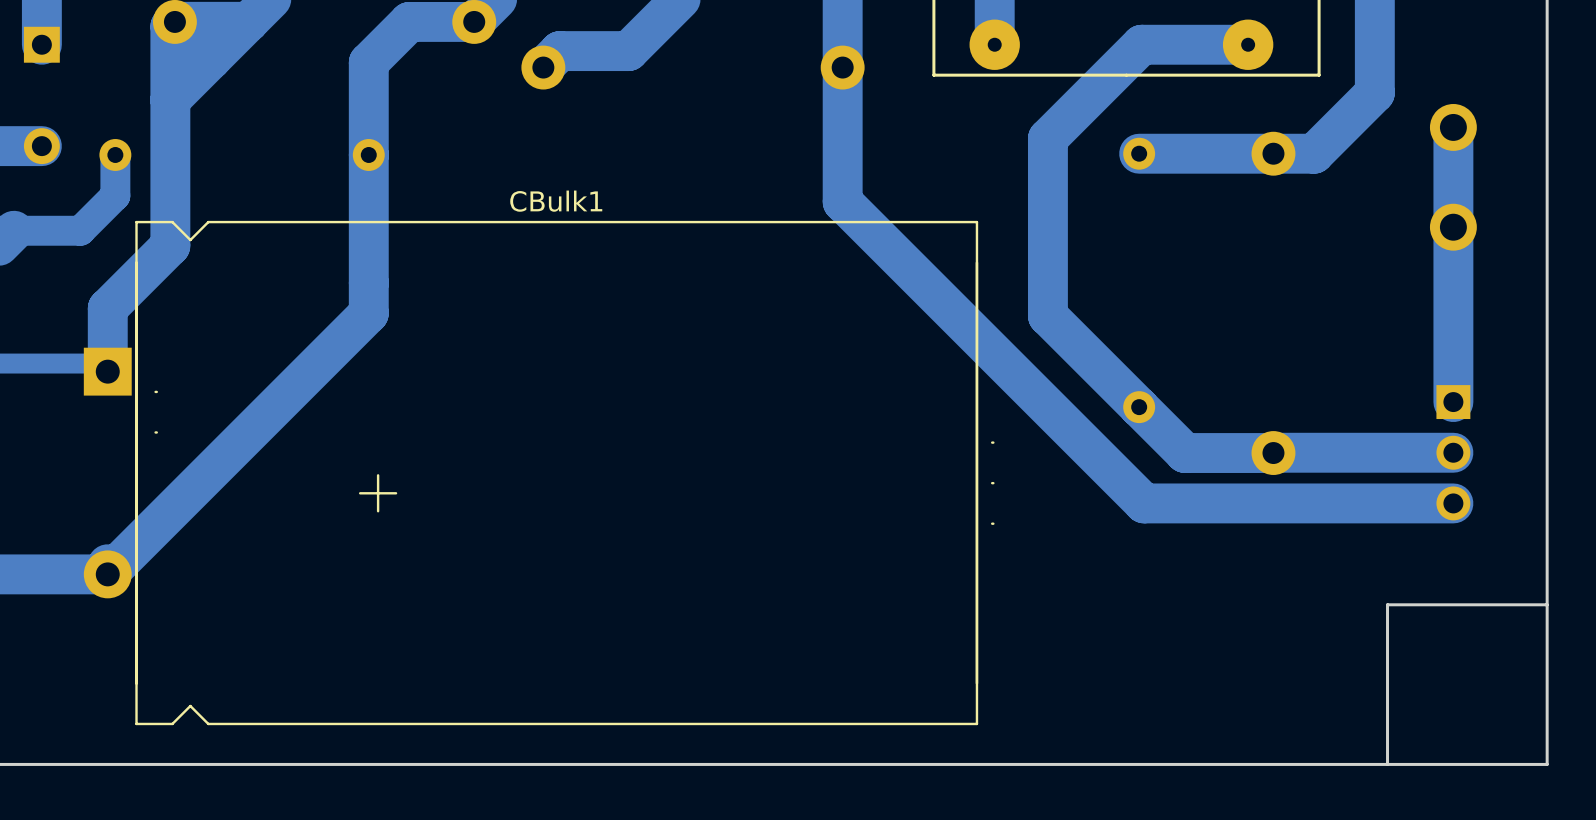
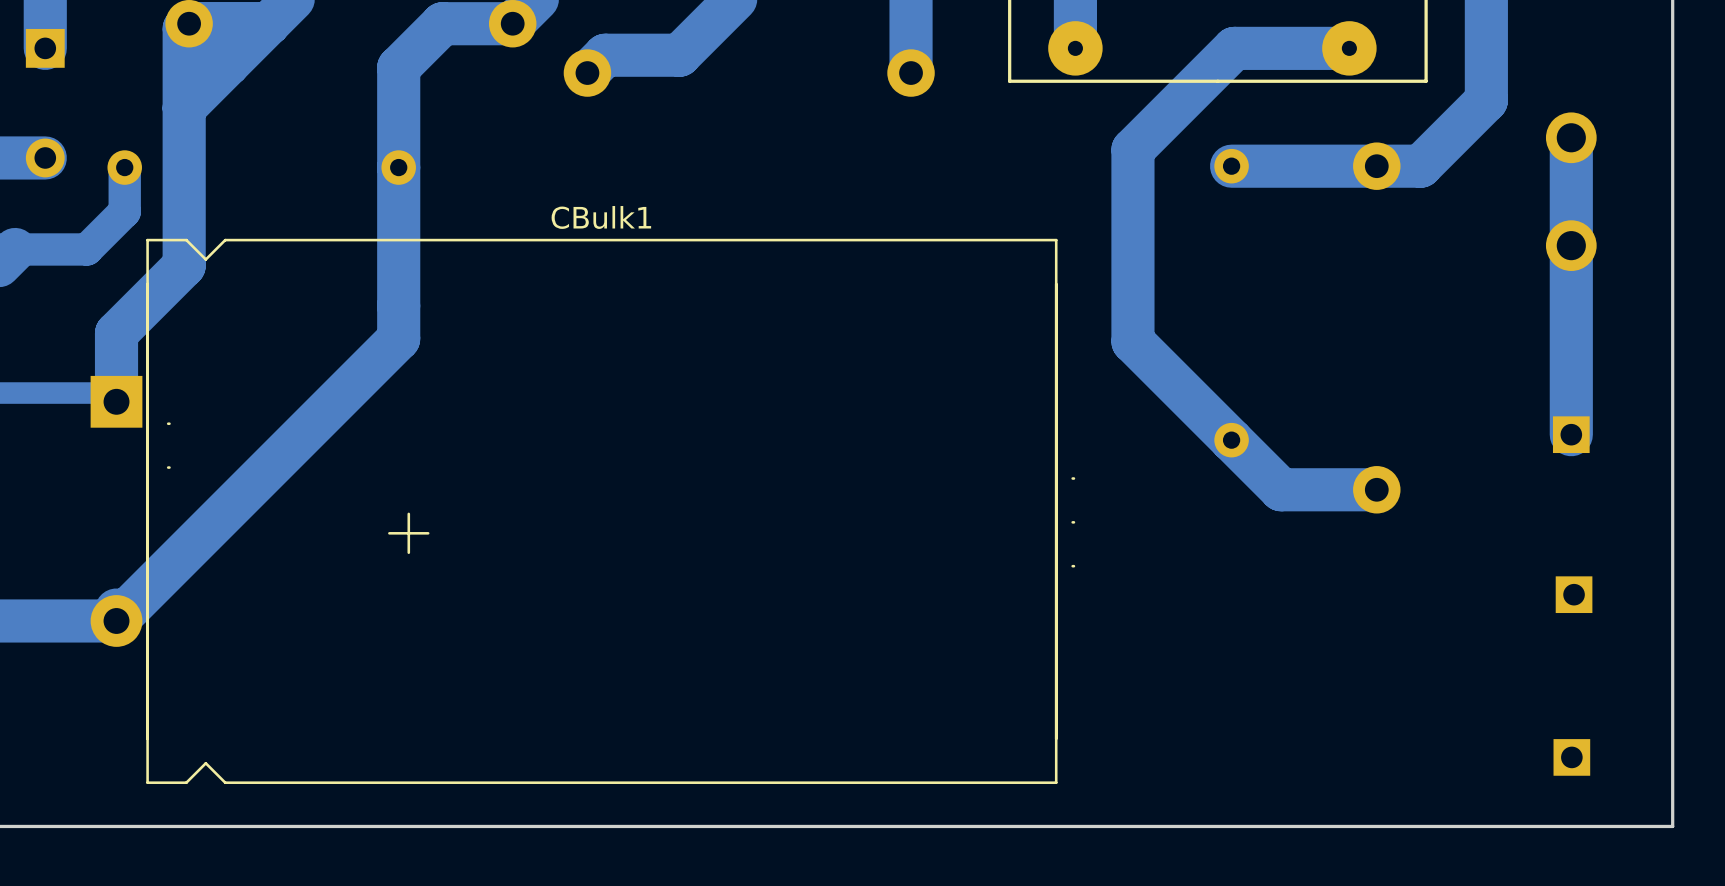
track: (842, 67) (842, 201) (1144, 503) (1453, 503) -> none
track: (1453, 452) (1273, 452) -> none
part: (1453, 452) -> none
part: none -> (1574, 594)
board edge: (1547, 604) (1387, 604) (1387, 764) -> none
part: none -> (1571, 757)

